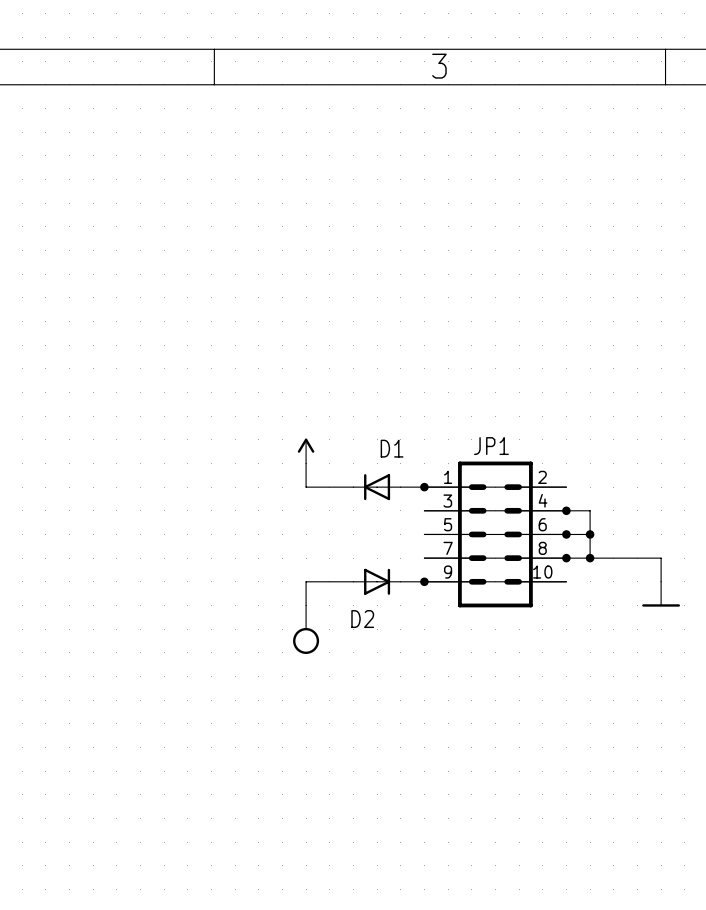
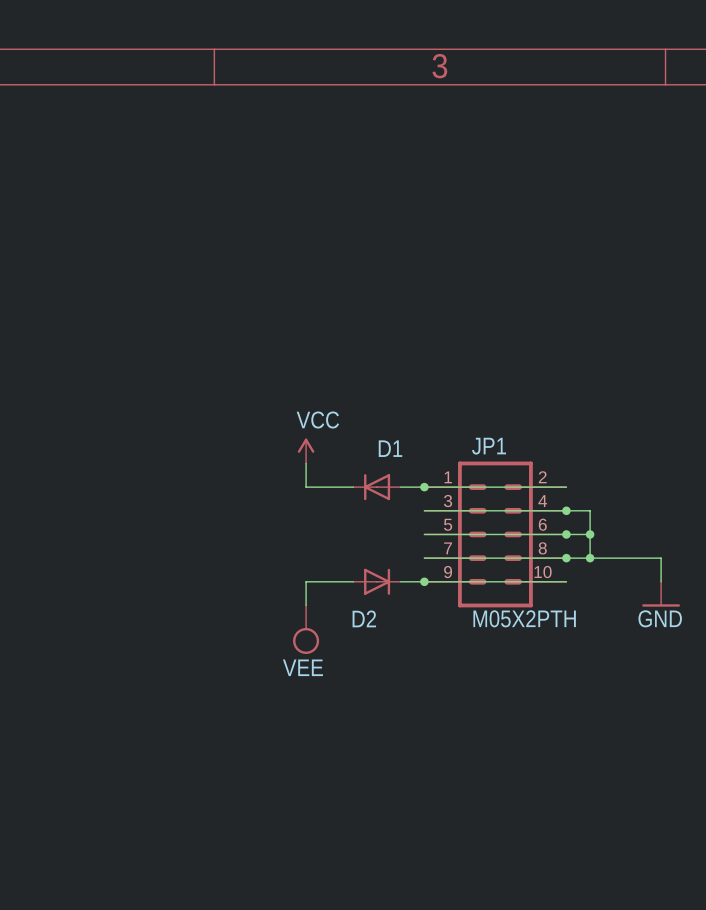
power symbol text: none -> VCC (317, 420)
JP1 value: none -> M05X2PTH (524, 618)
power symbol text: none -> GND (660, 618)
power symbol text: none -> VEE (302, 667)

